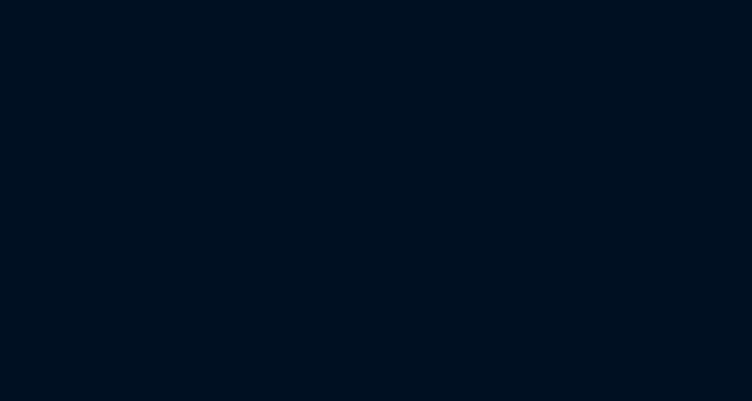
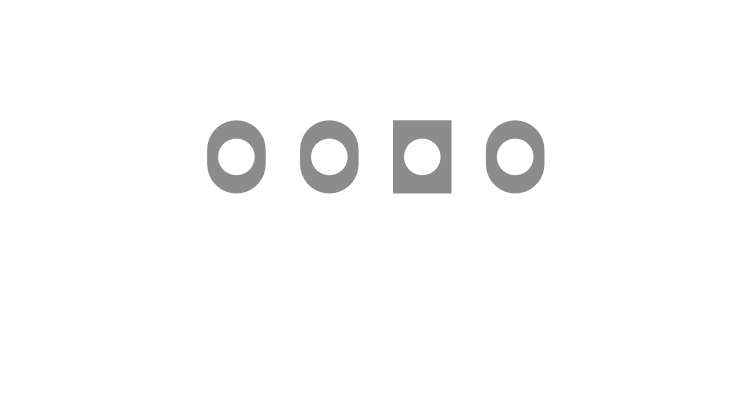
part: none -> (375, 156)

